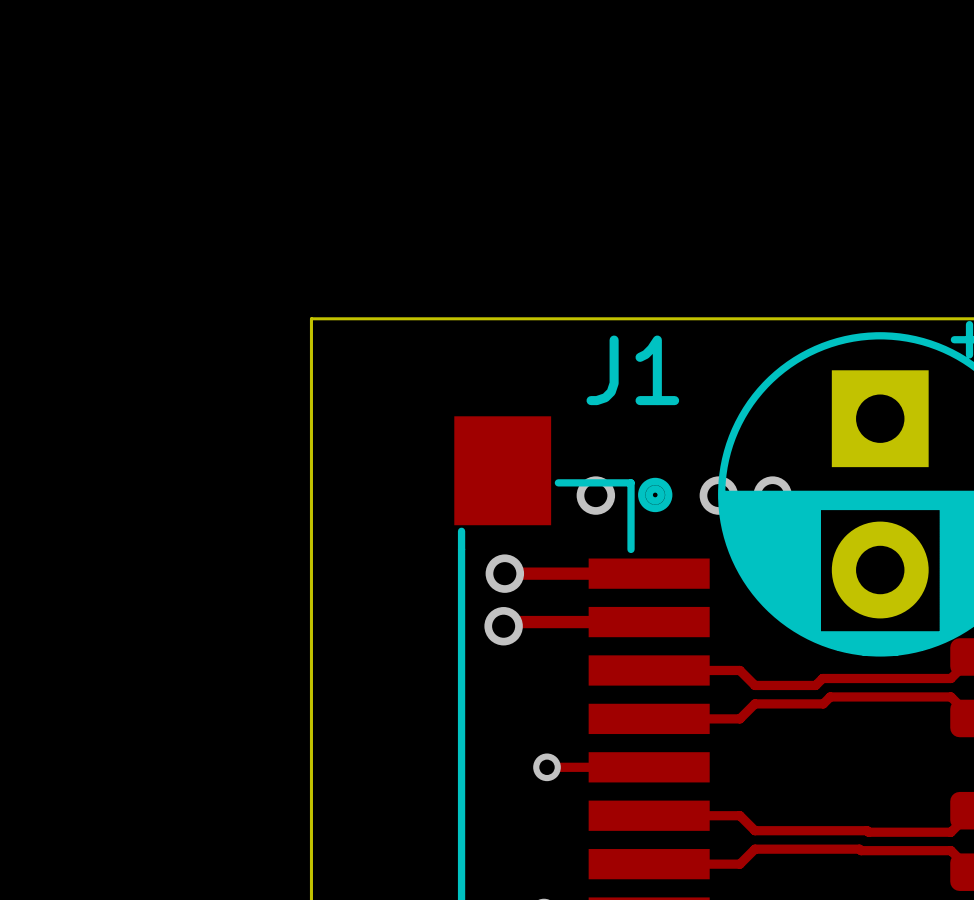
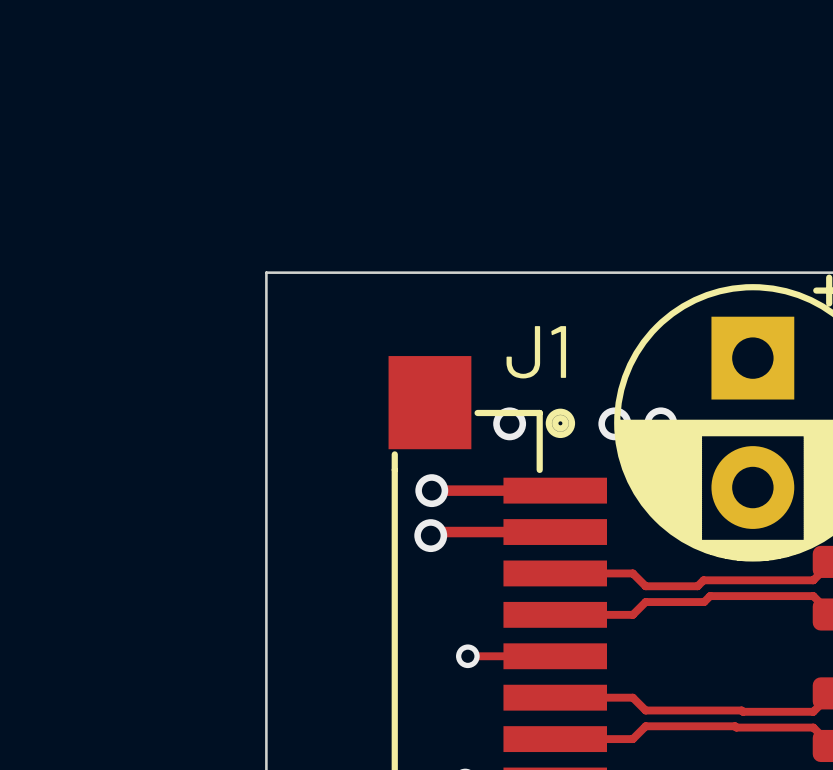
J1 name position: J1 (632, 370) -> J1 (536, 352)

